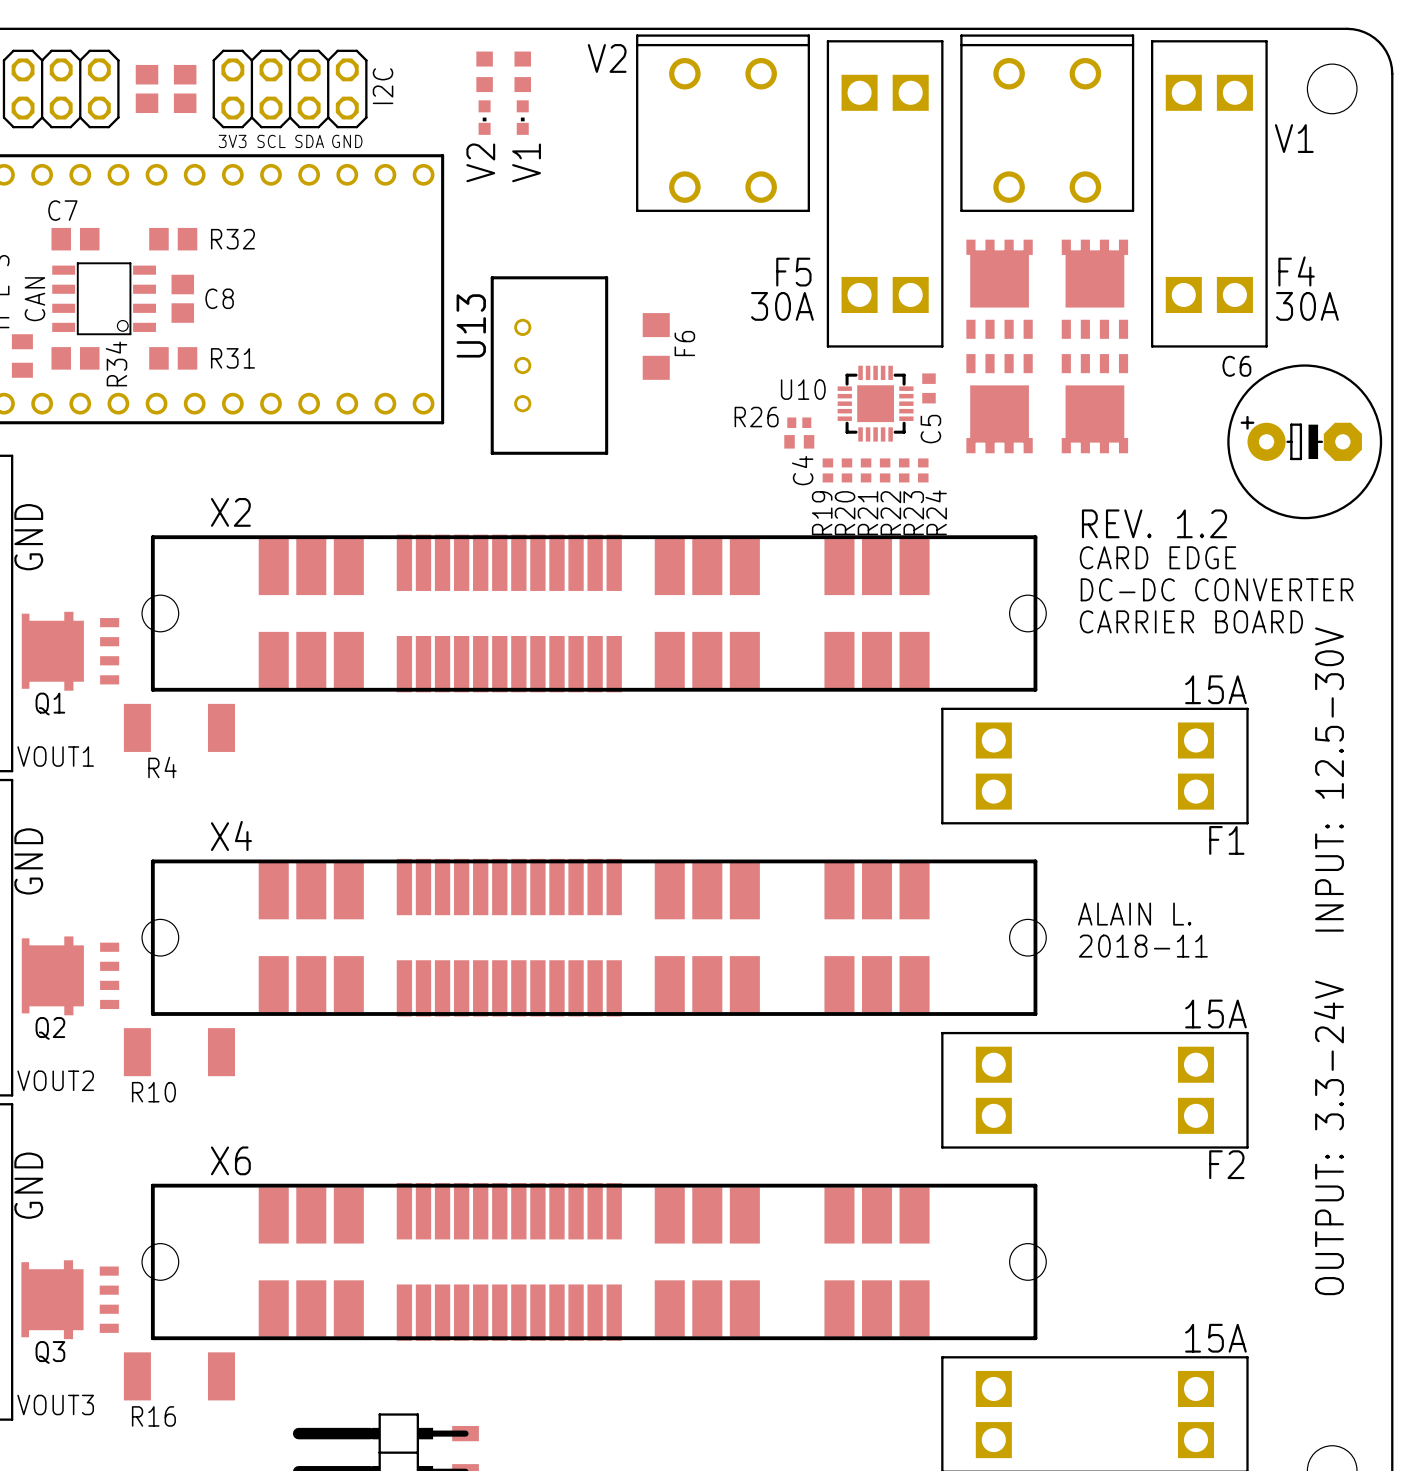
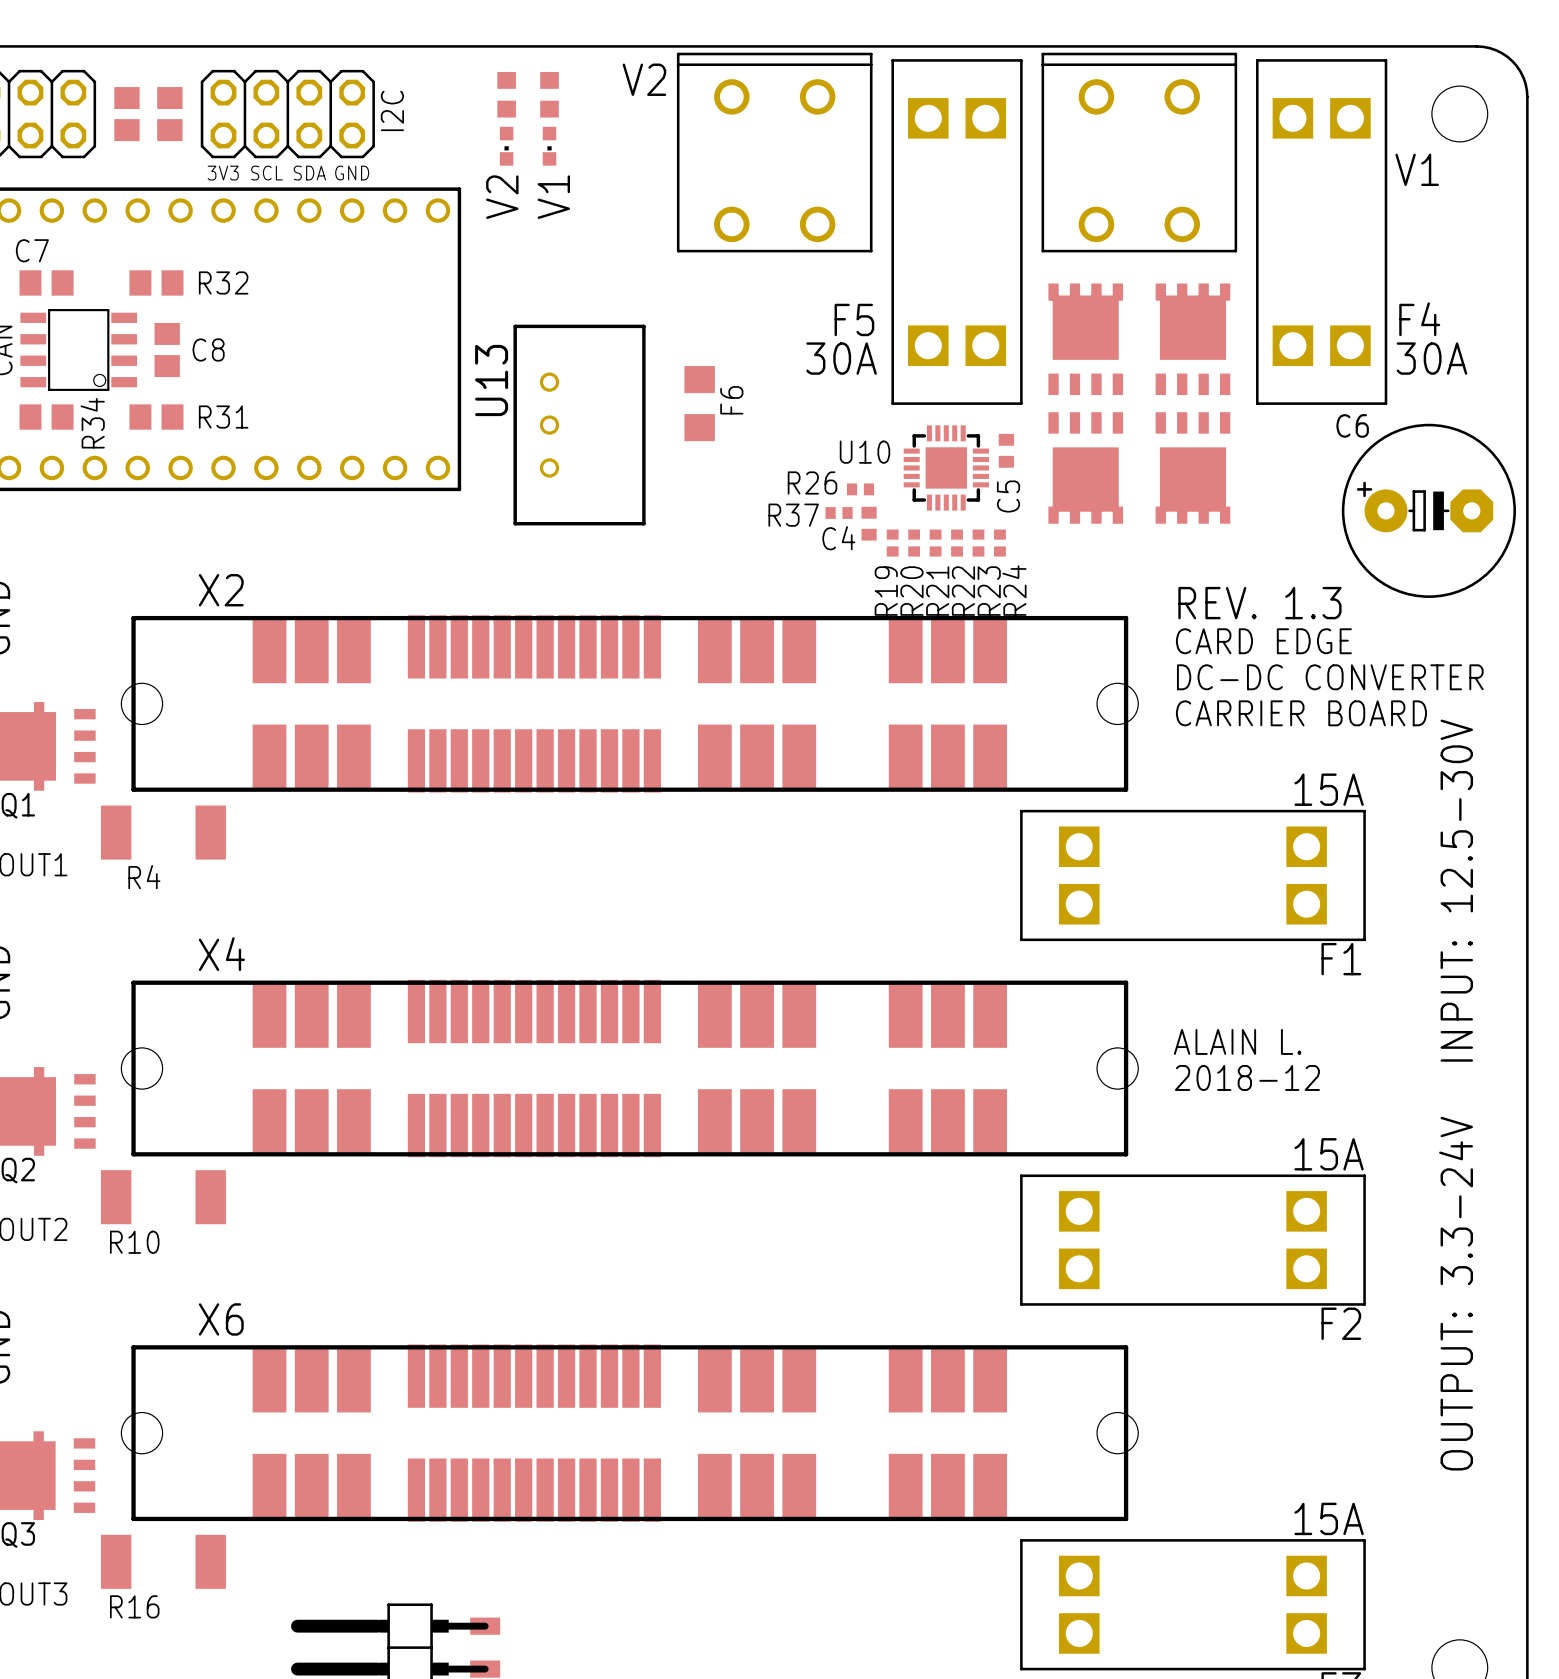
C4 rotation: 0° (799, 441) -> 90° clockwise (869, 523)
R37: none -> (839, 513)
text: REV. 1.2 (1154, 523) -> REV. 1.3 (1259, 603)
text: 2018-11 (1143, 946) -> 2018-12 (1247, 1077)

